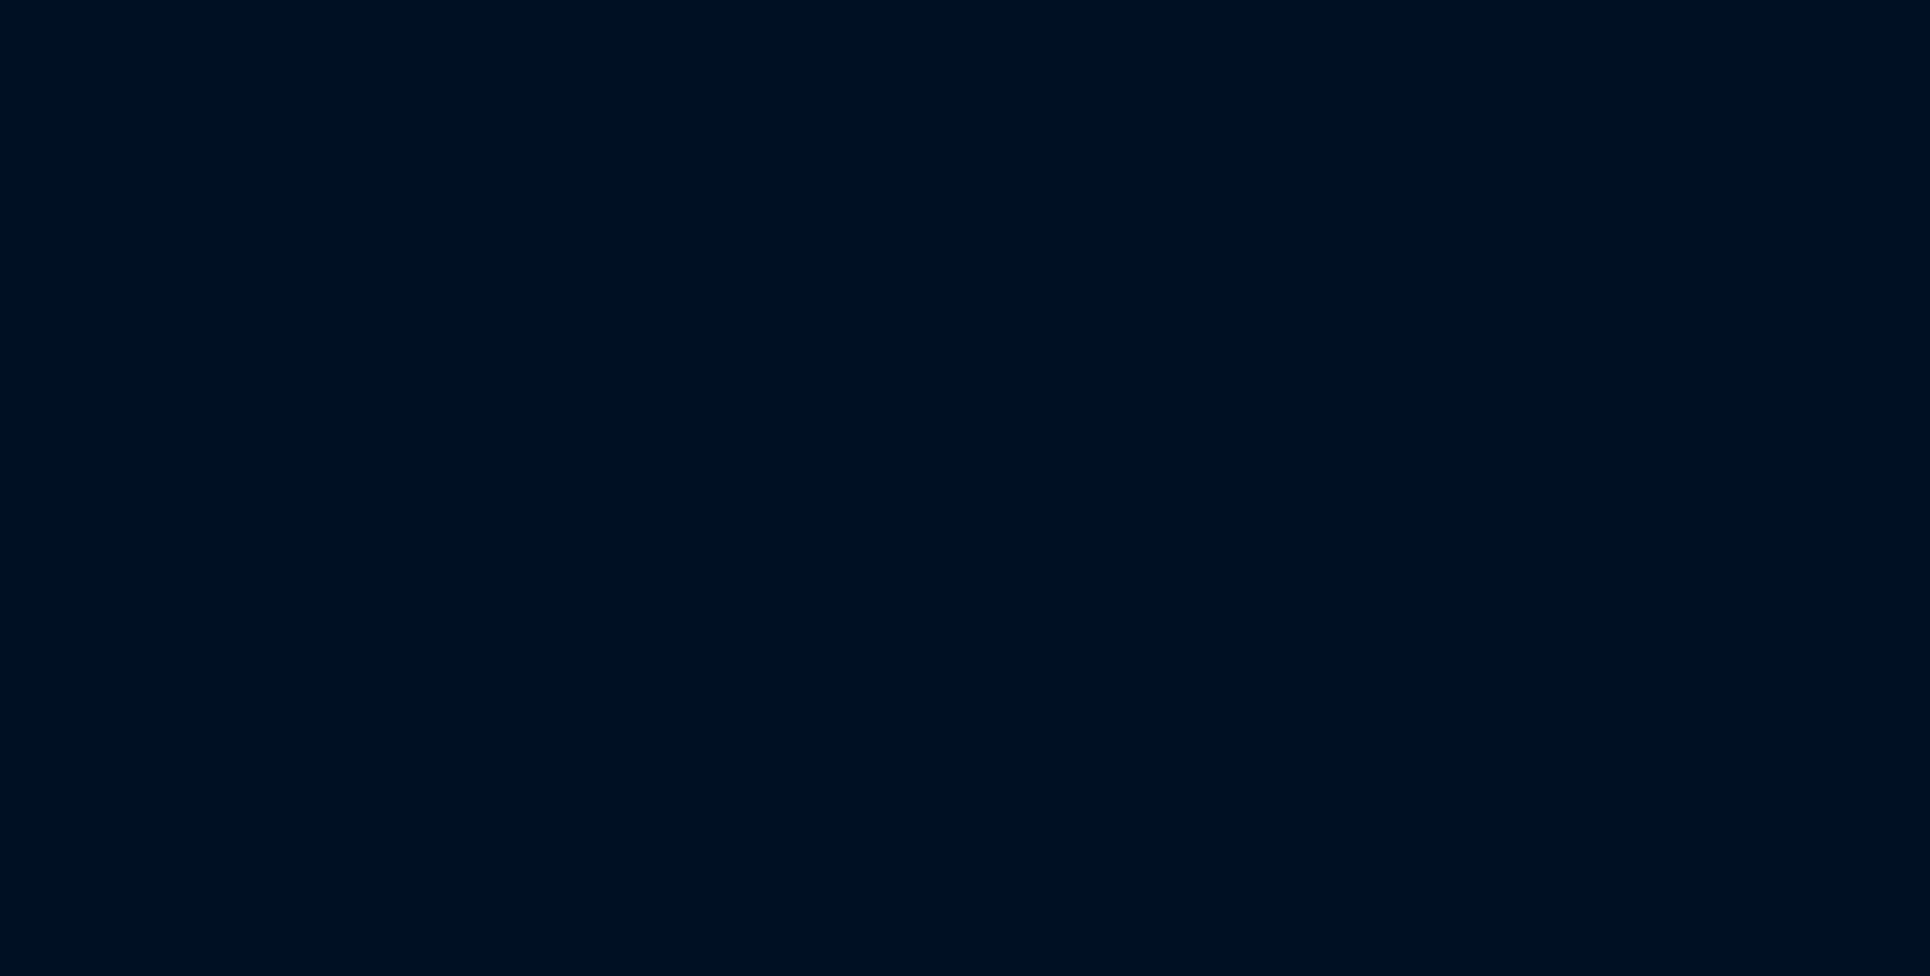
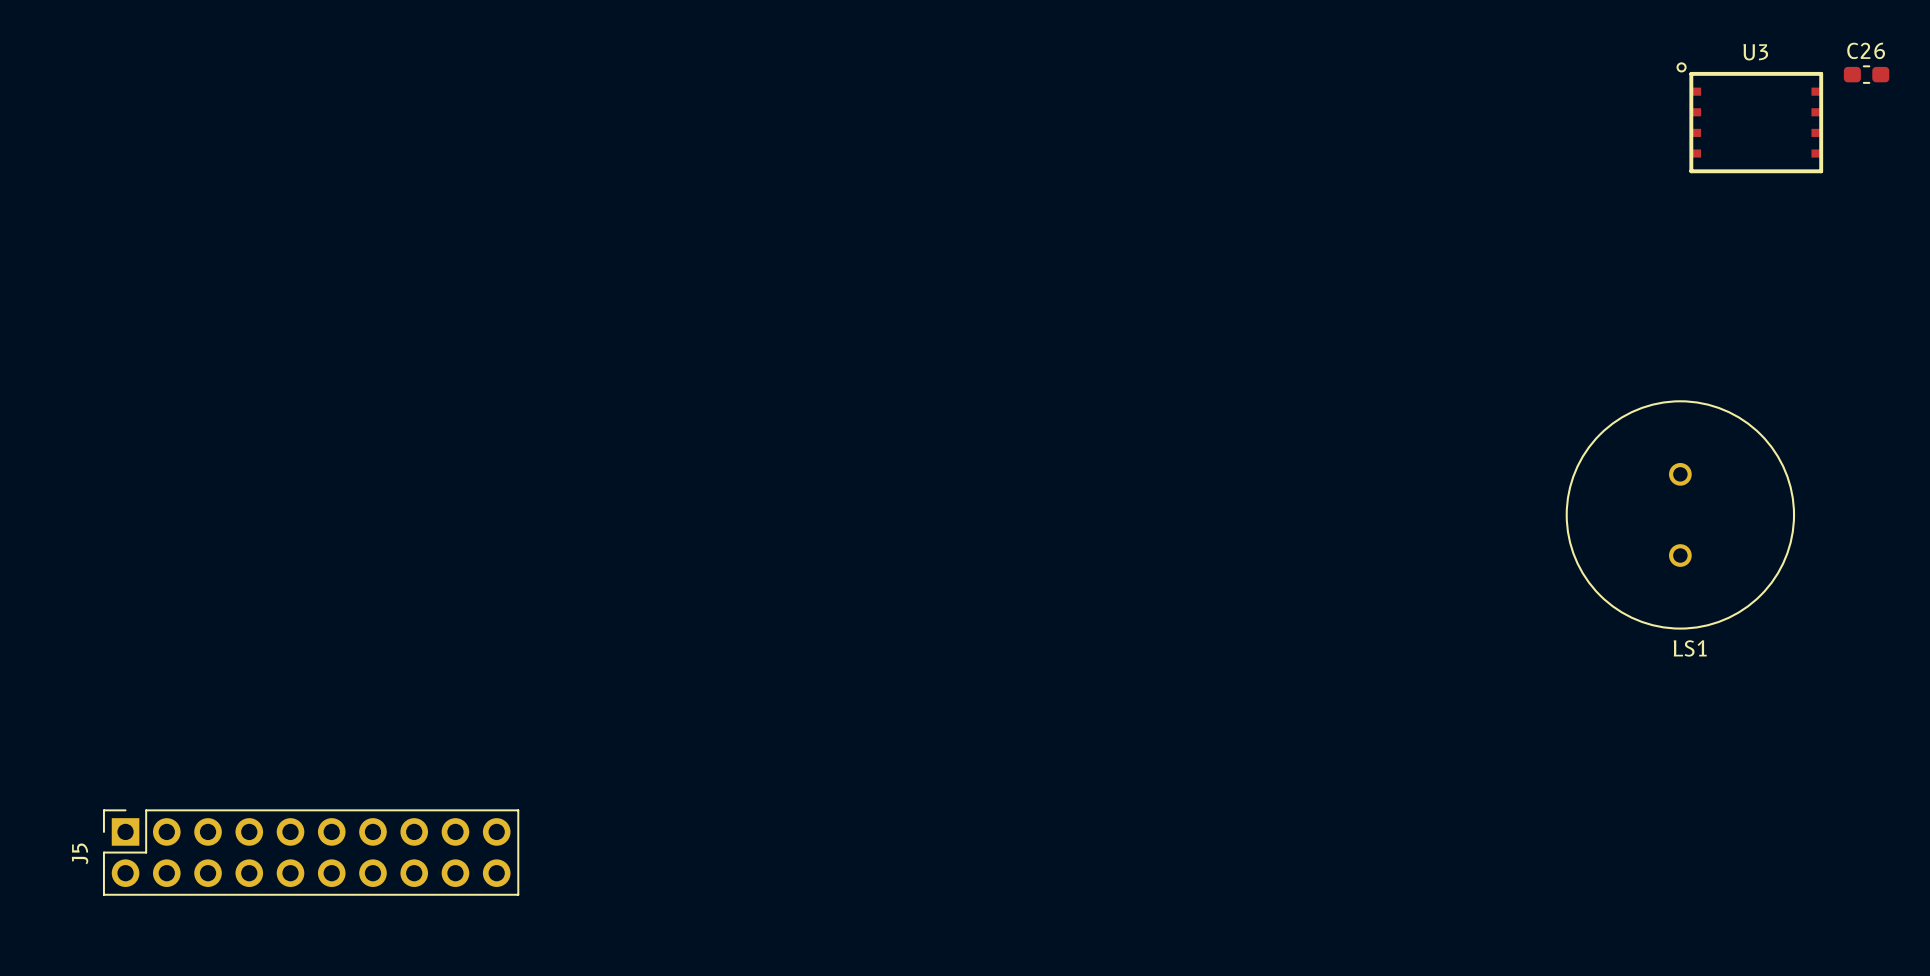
C26: none -> (1866, 74)
U3: none -> (1749, 117)
LS1: none -> (1680, 514)
J5: none -> (311, 852)

